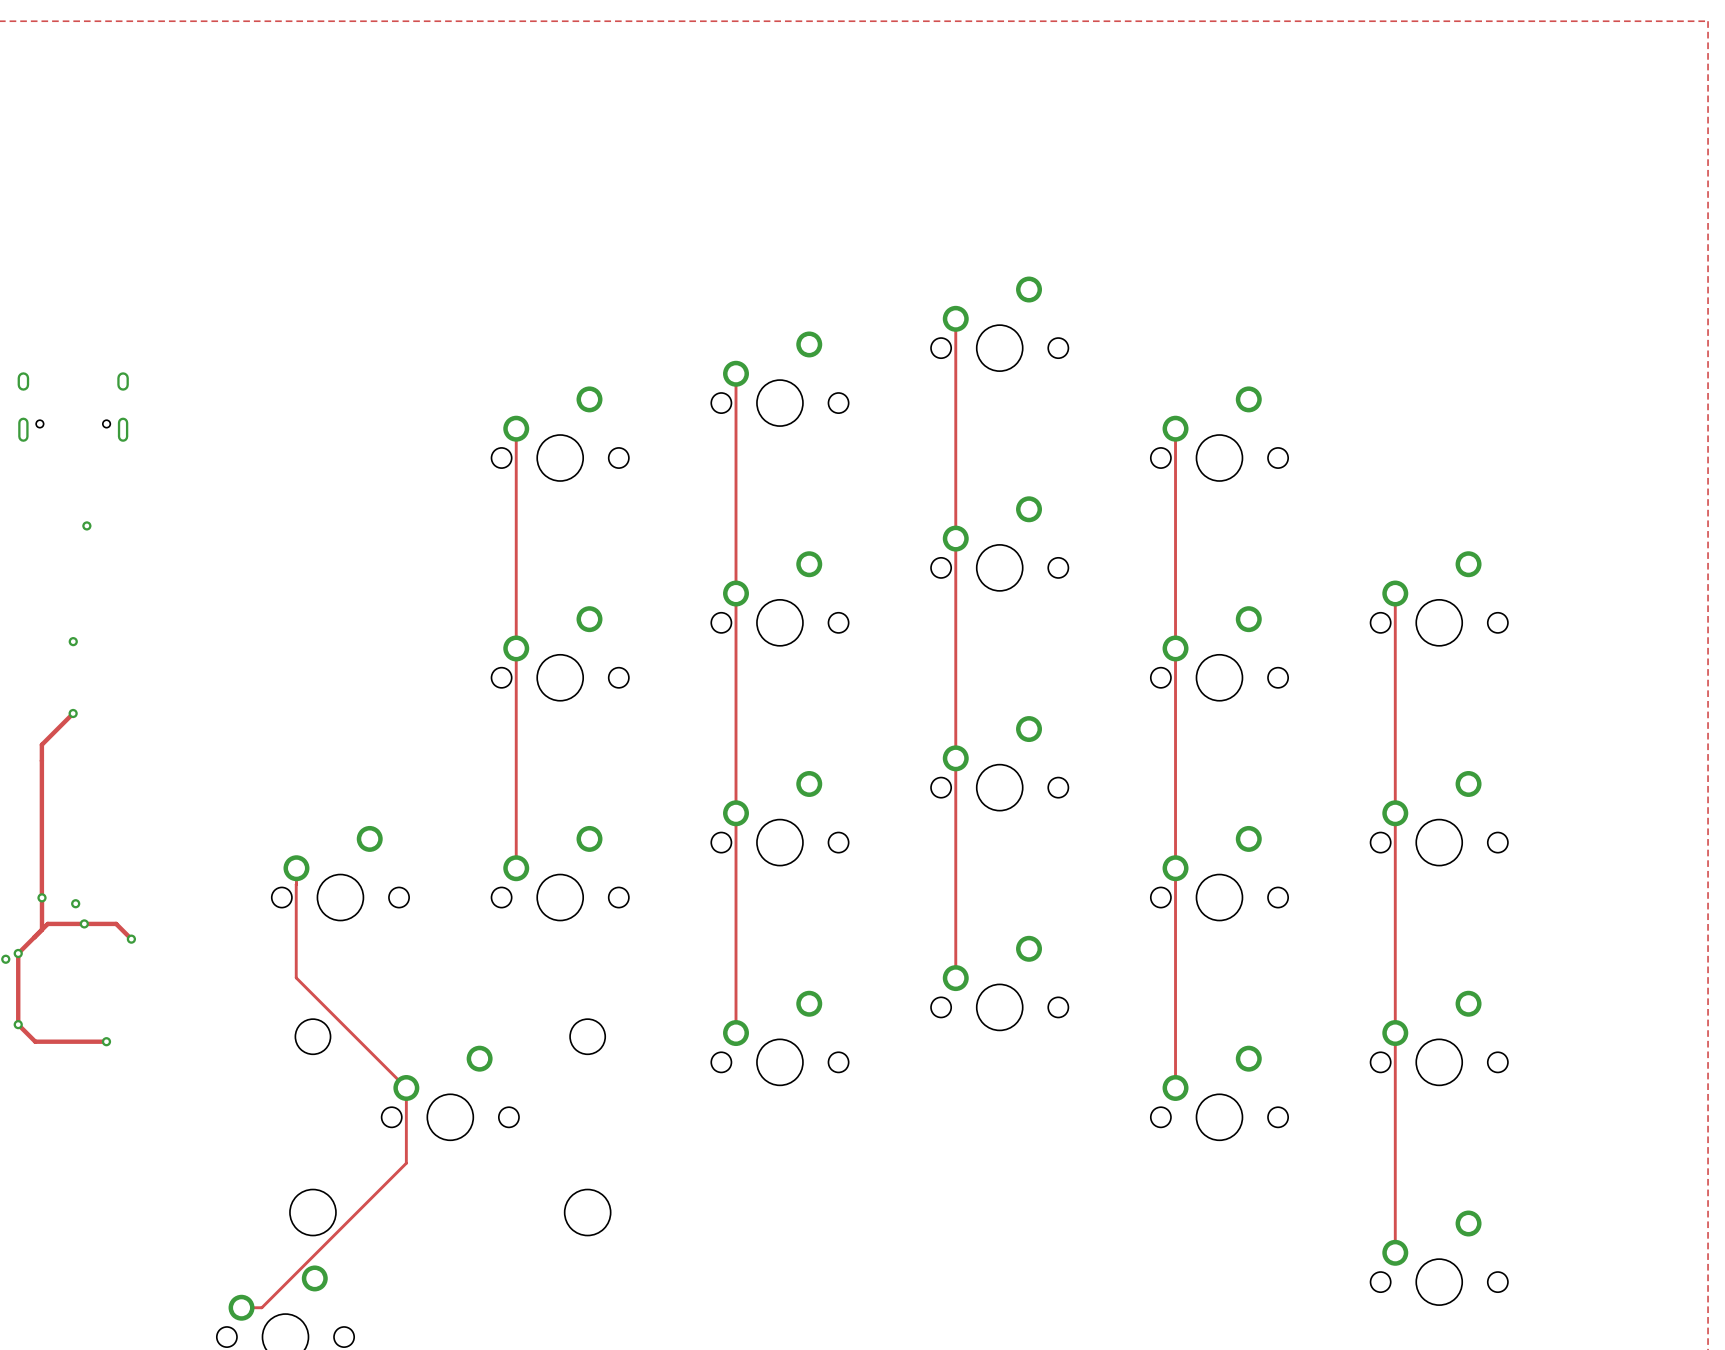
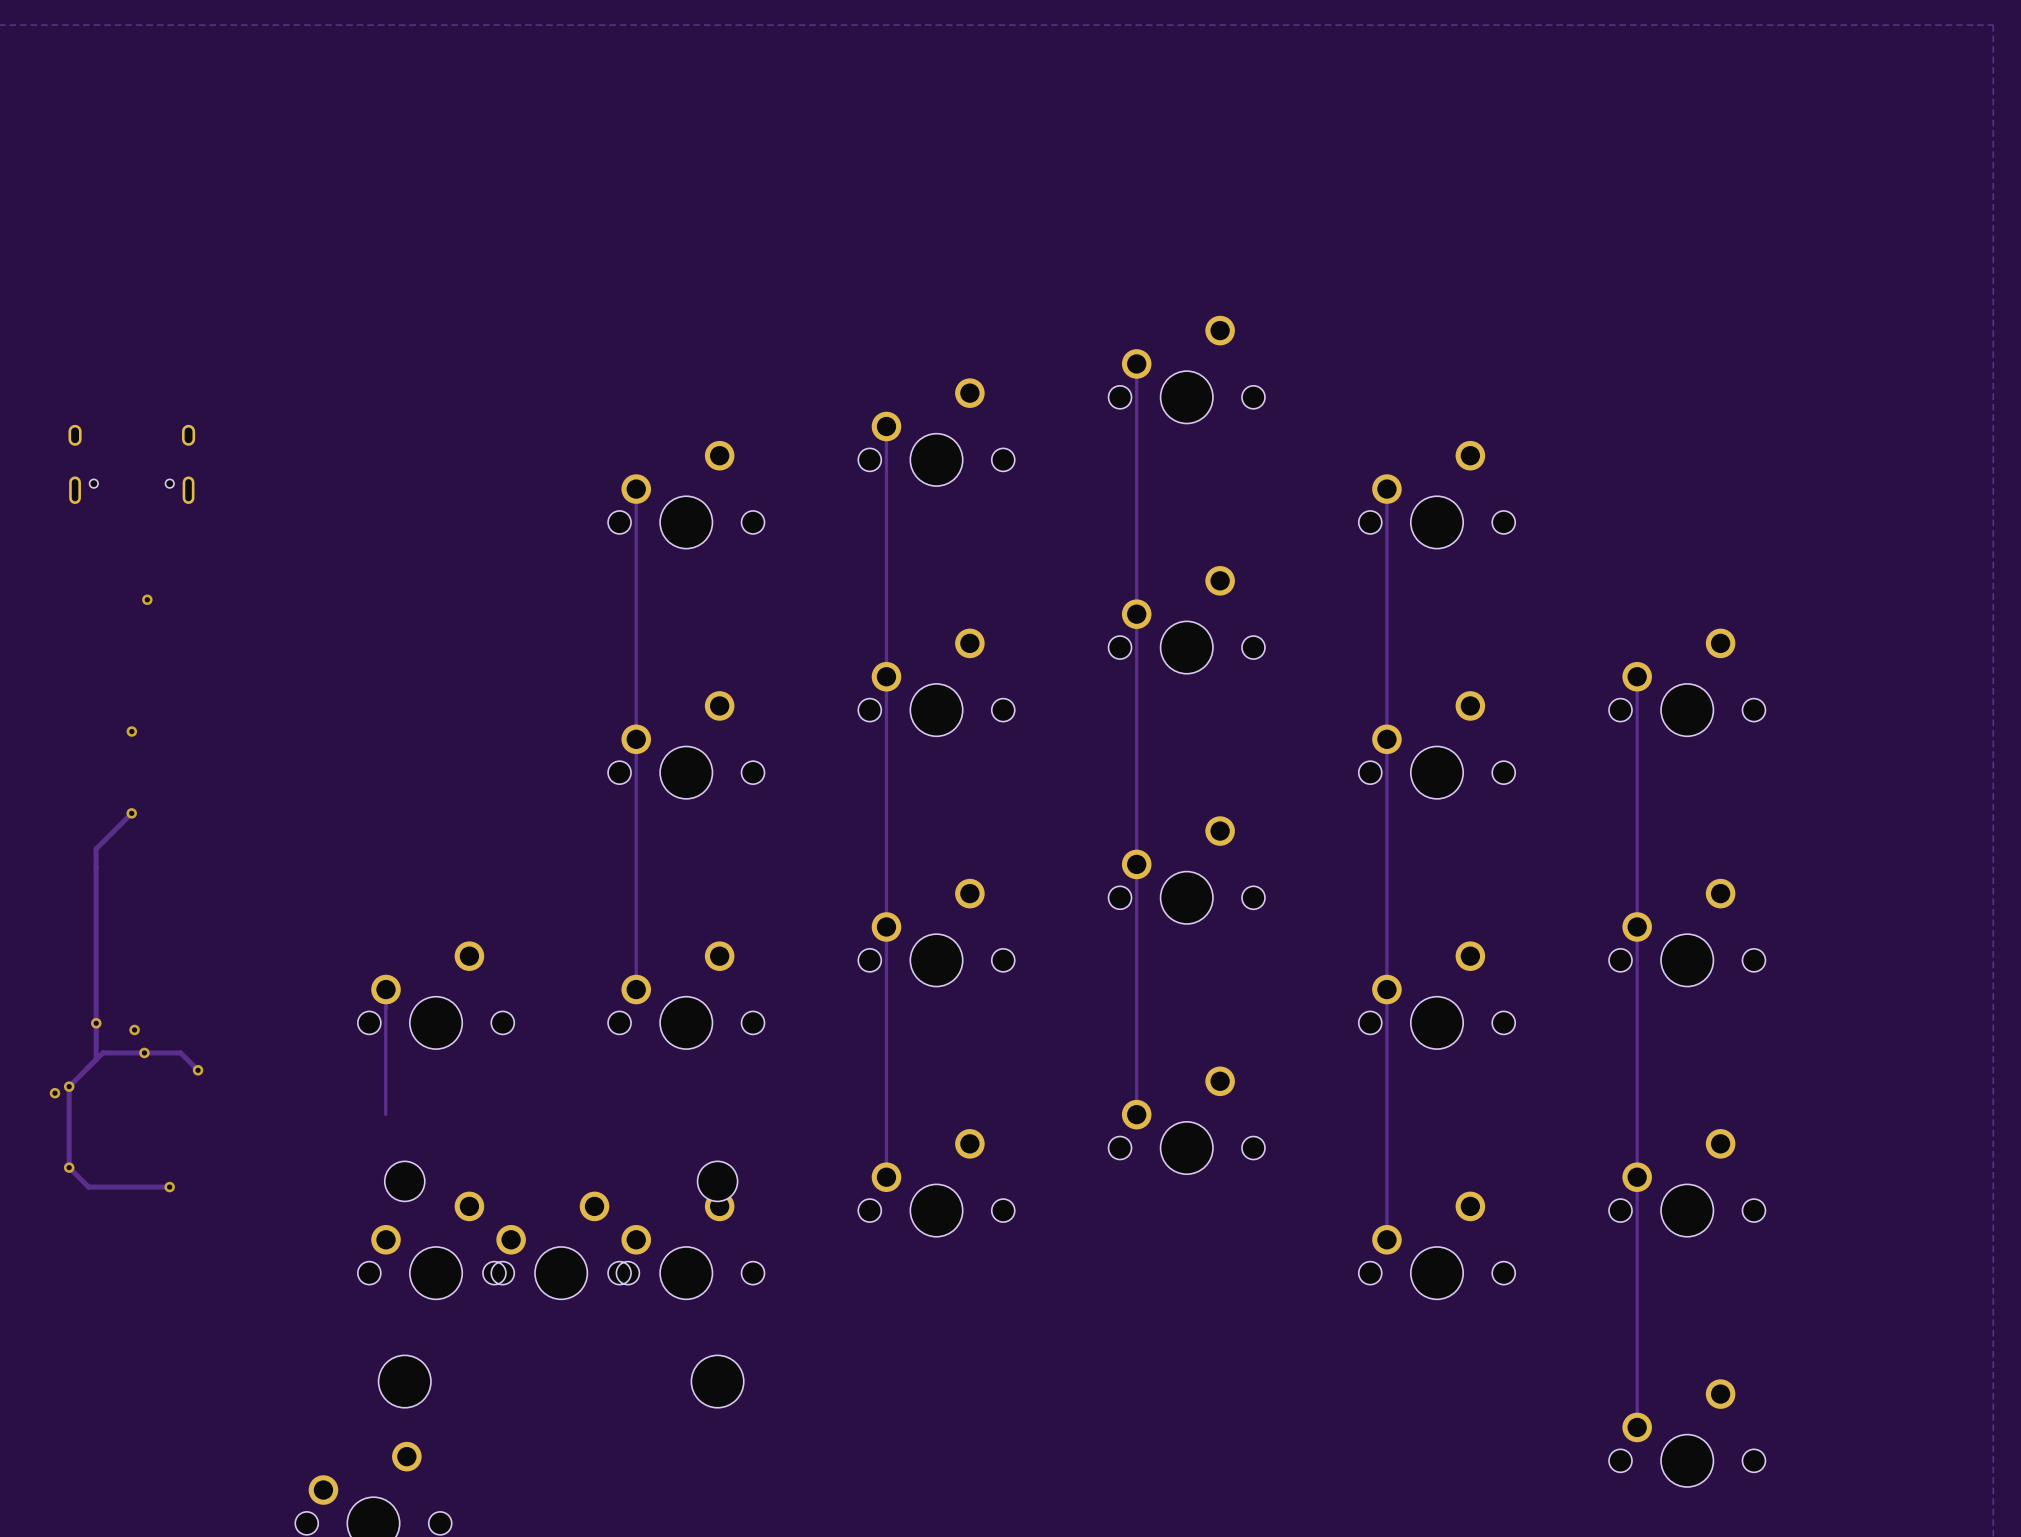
track: (296, 977) (406, 1087) (406, 1163) (261, 1307) (241, 1307) -> none
part: none -> (436, 1245)
part: none -> (686, 1245)

